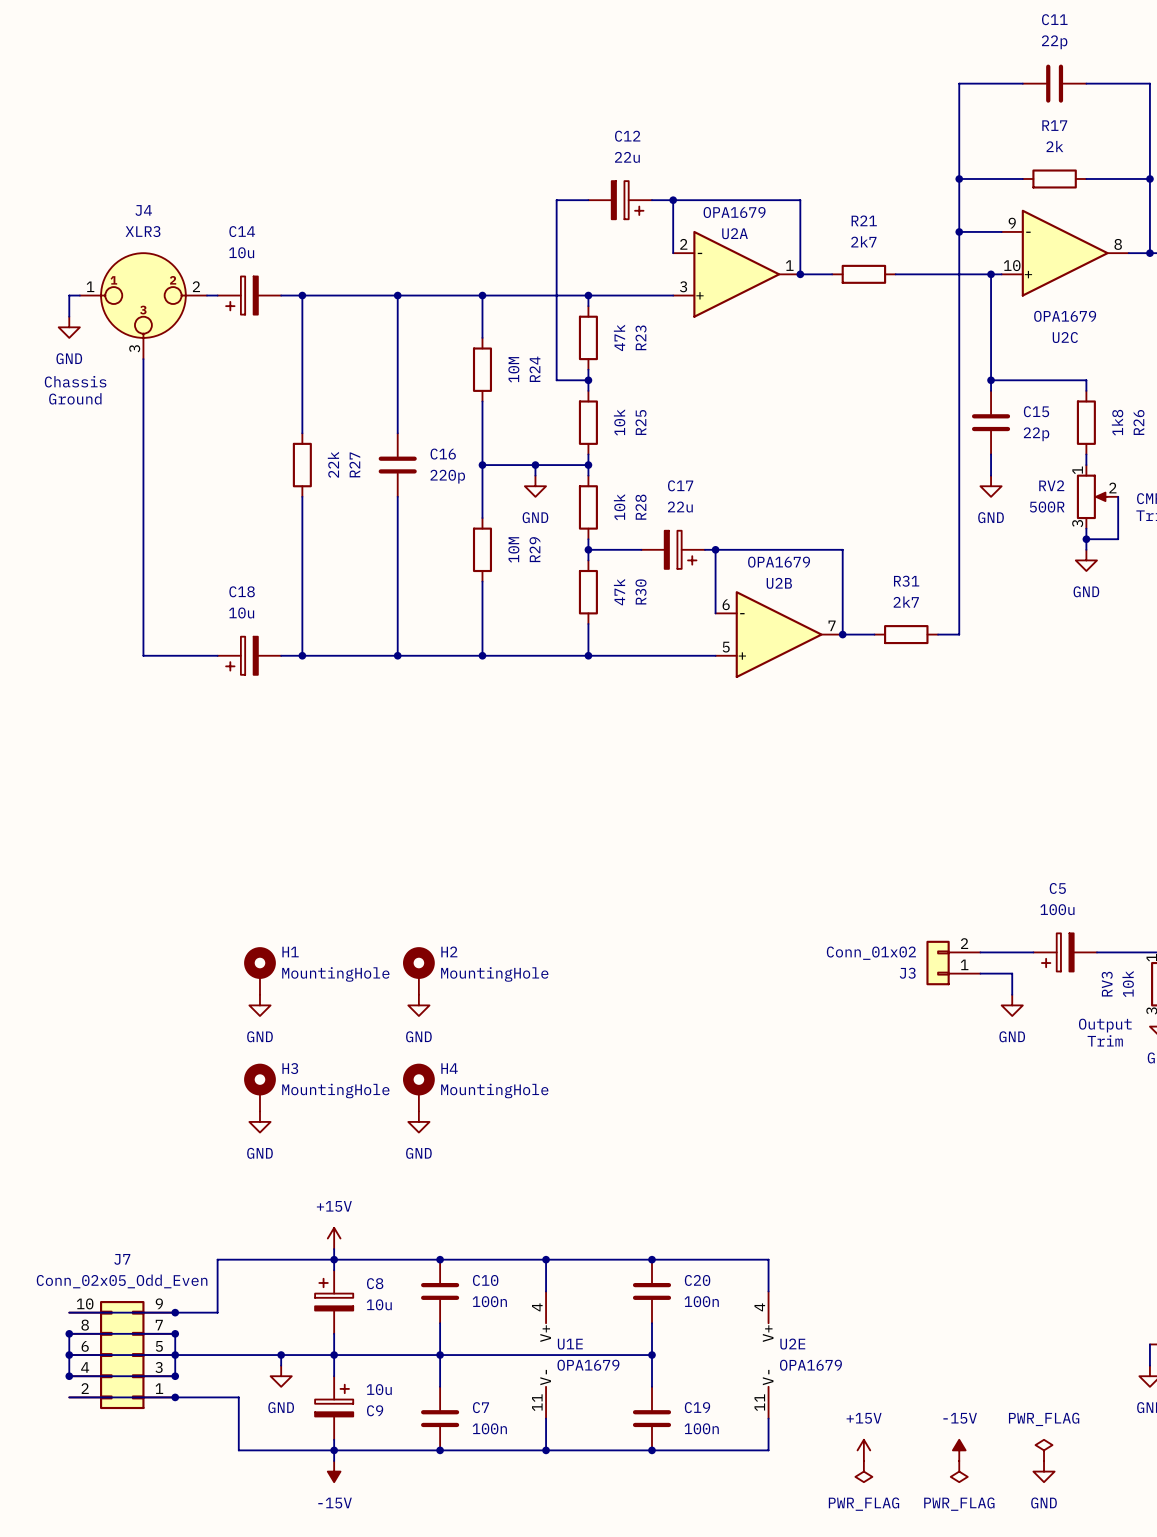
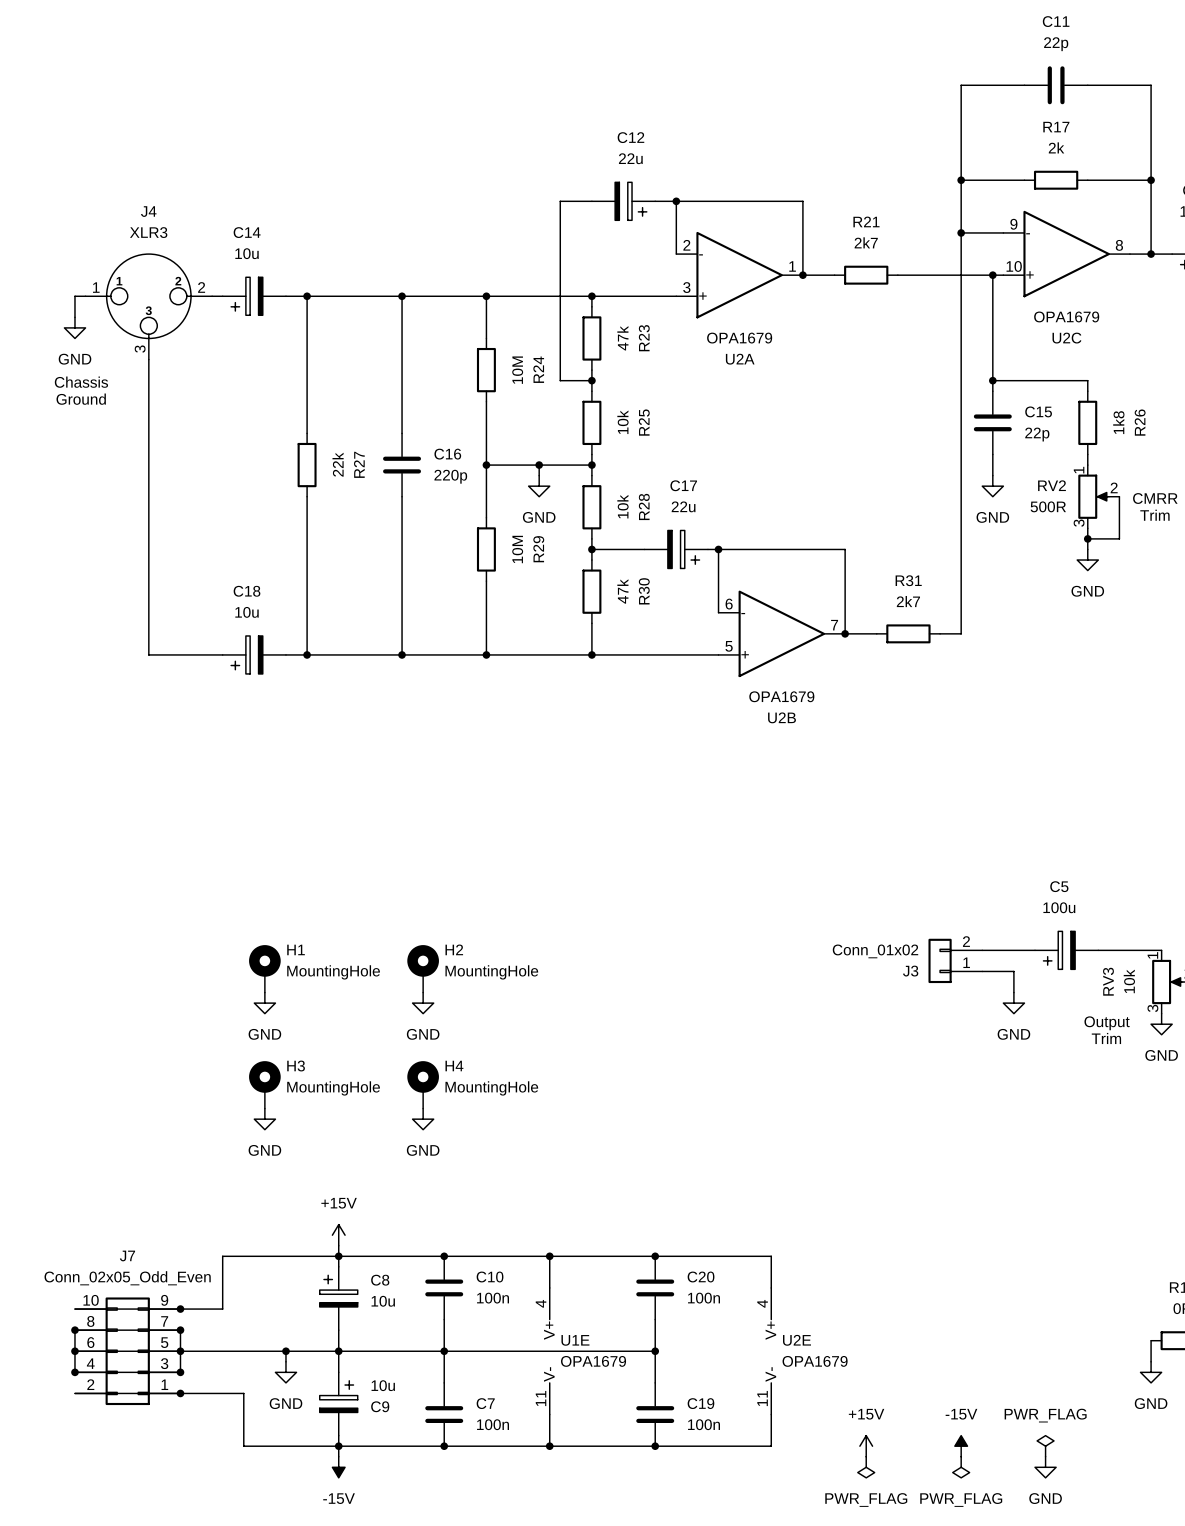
U2A value position: OPA1679 (734, 212) -> OPA1679 (739, 338)
U2A name position: U2A (735, 233) -> U2A (740, 359)
U2B value position: OPA1679 (779, 562) -> OPA1679 (781, 696)
U2B name position: U2B (779, 583) -> U2B (782, 717)

